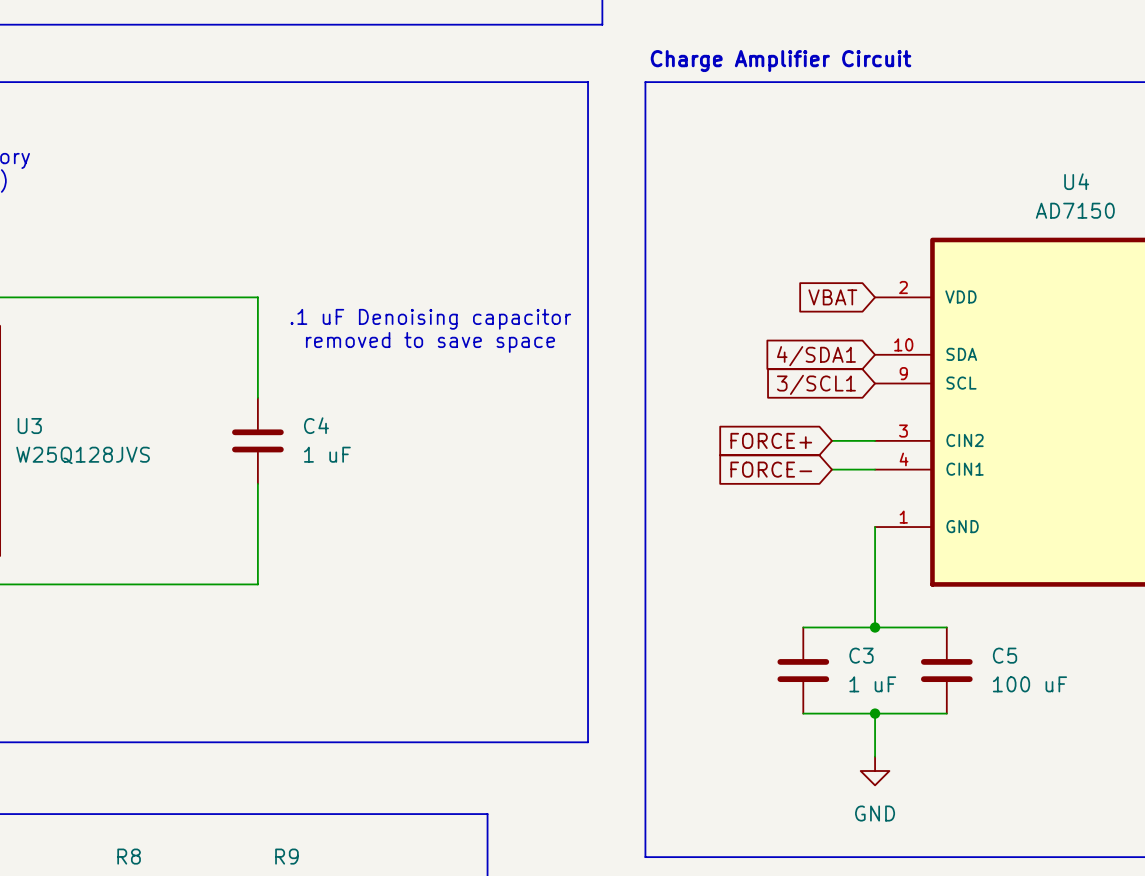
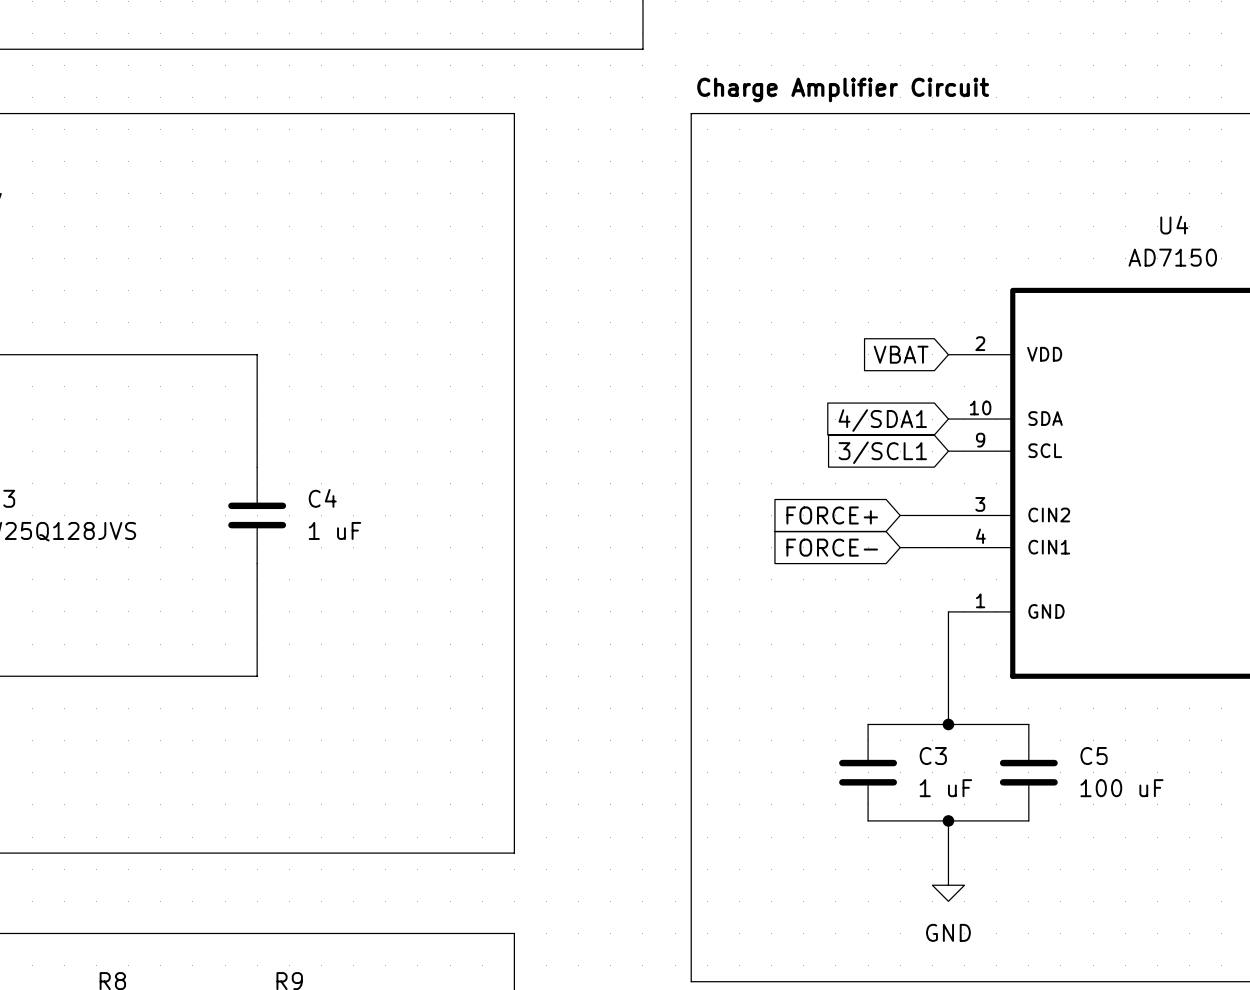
line: (487, 82) (588, 82) (588, 742) (487, 742) -> (514, 113) (514, 853)
text: .1 uF Denoising capacitor (430, 319) -> none
text: removed to save space (430, 342) -> none

